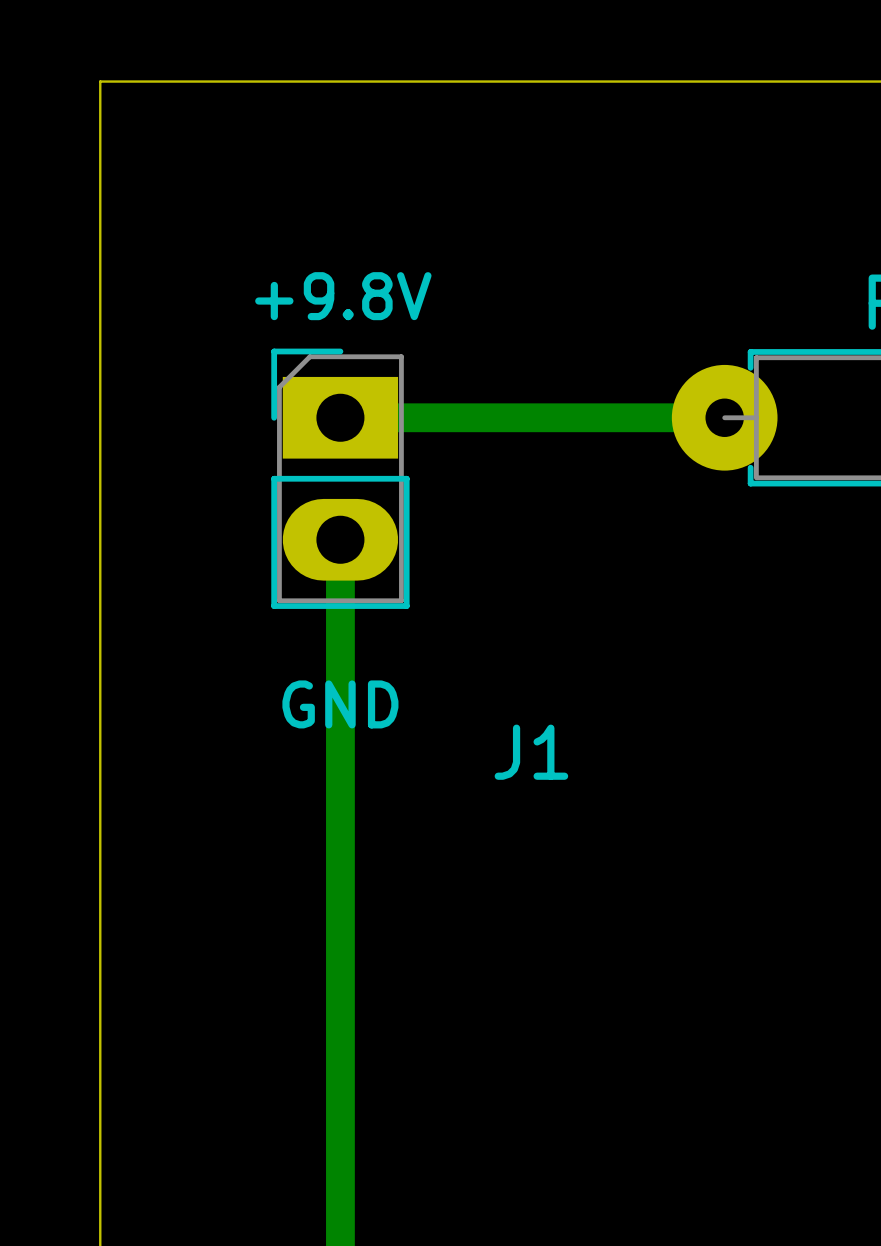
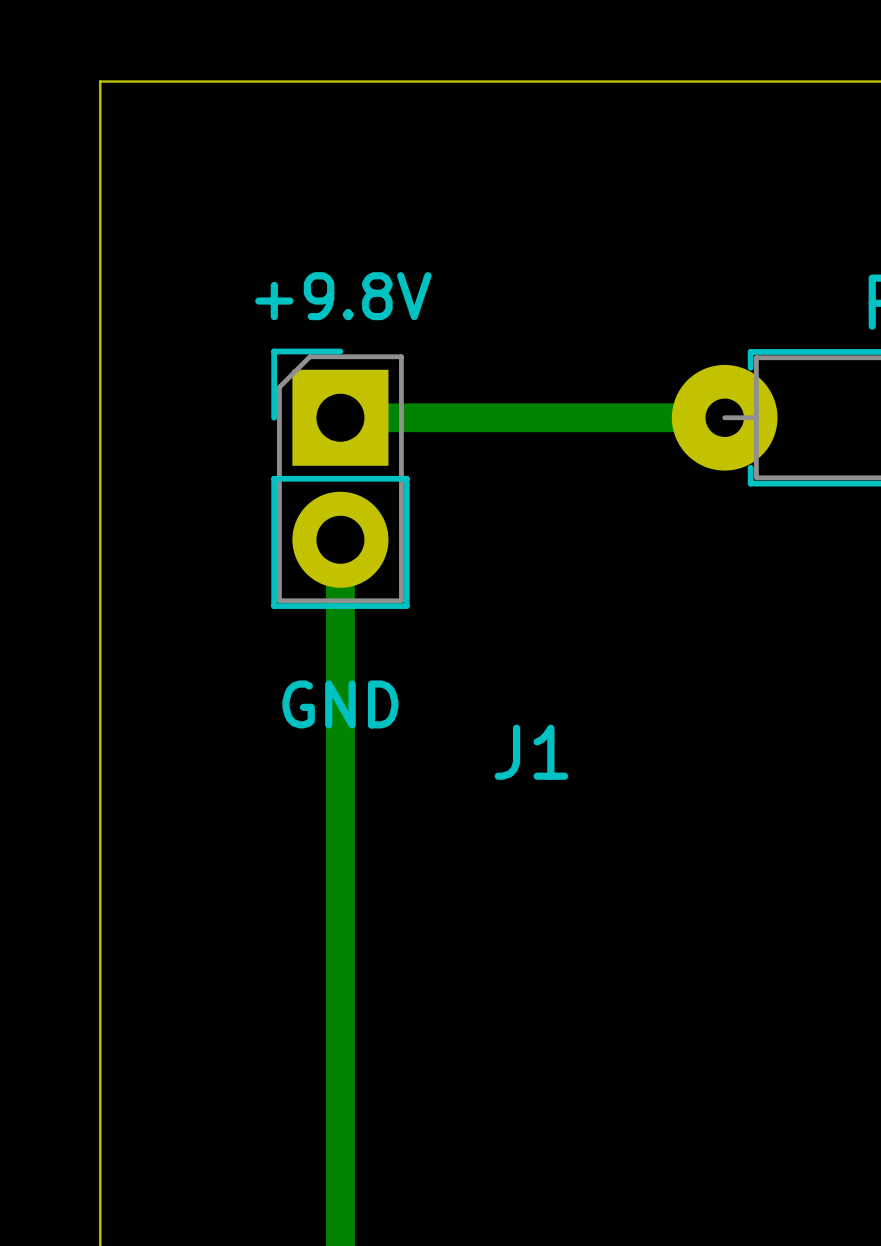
J1 footprint: [271, 348, 410, 609] -> [271, 348, 410, 609]

